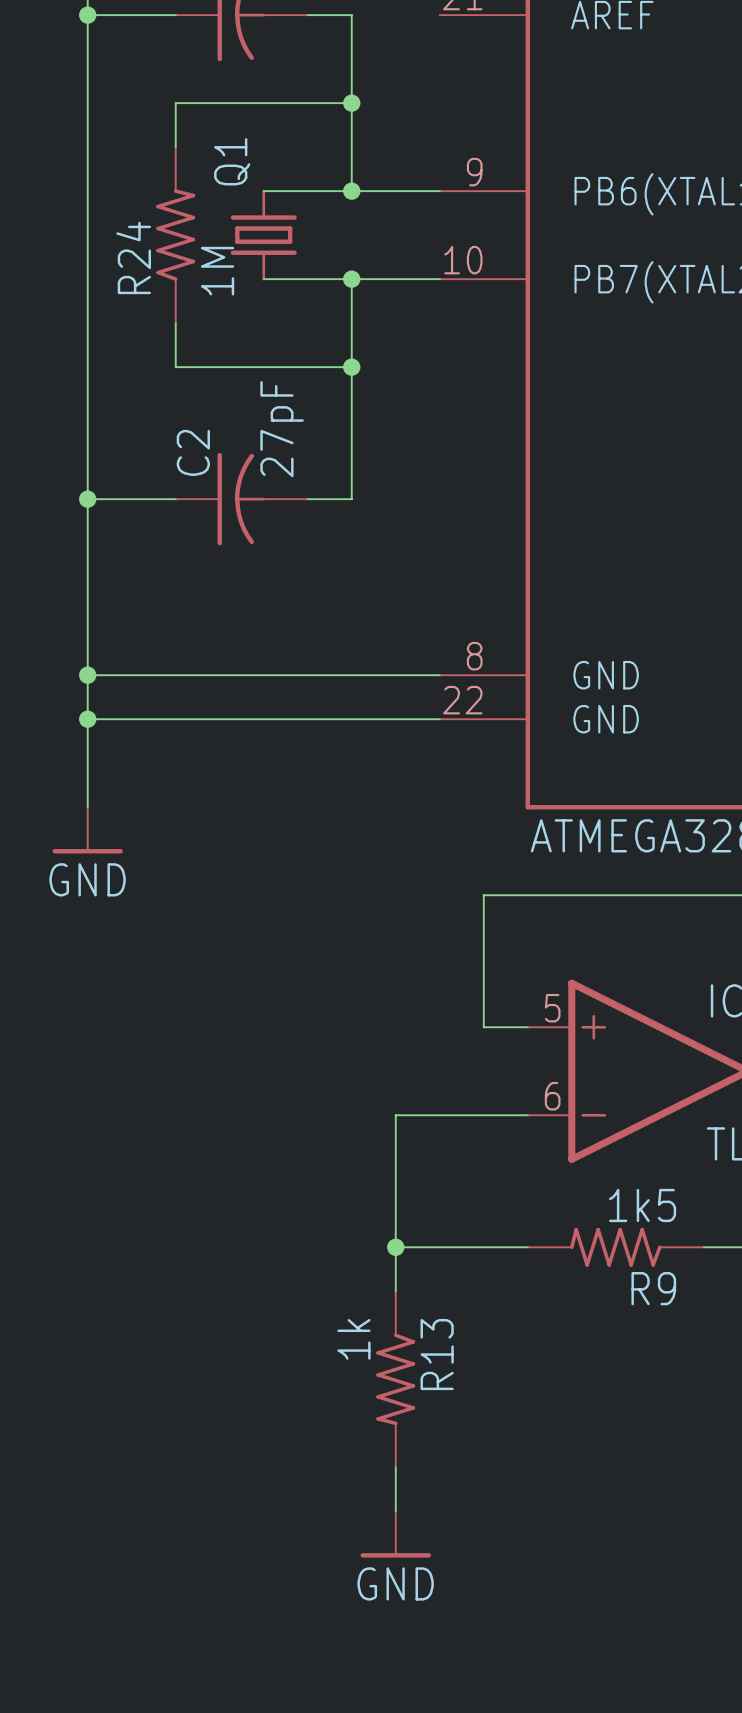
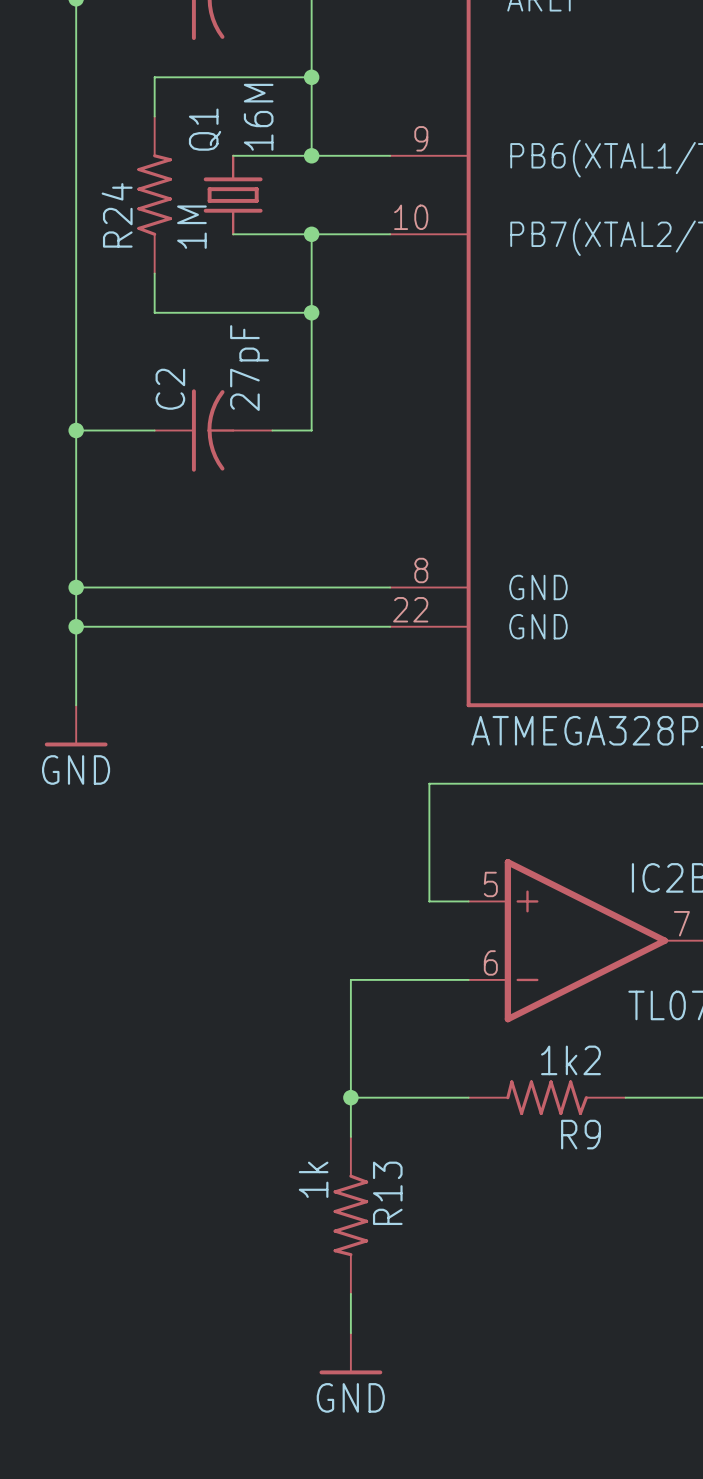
Q1 value: none -> 16M (258, 117)
R9 value: 1k5 (642, 1205) -> 1k2 (570, 1060)

